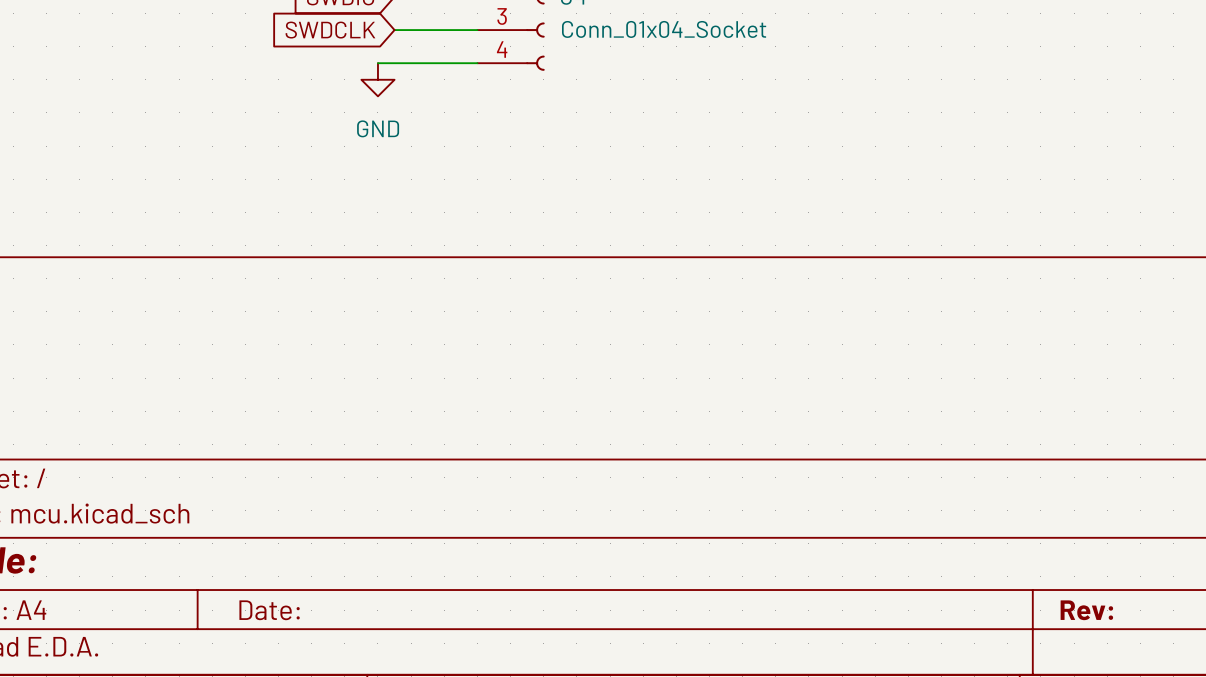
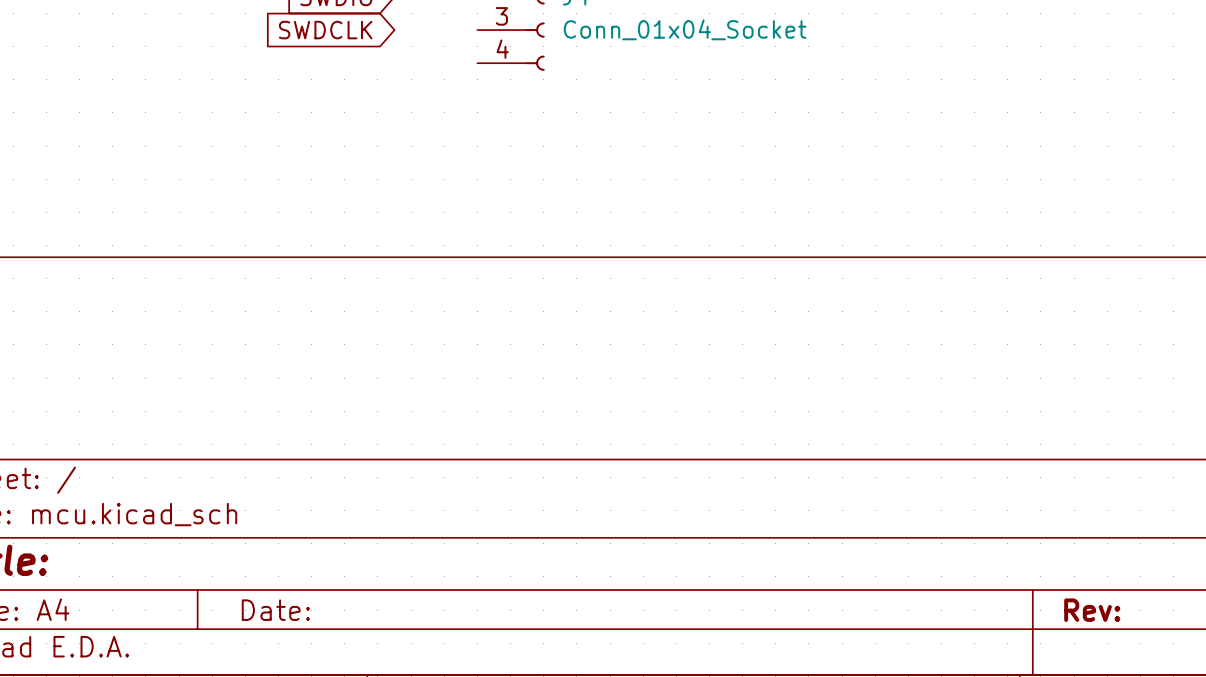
wire: (394, 30) (477, 30) -> none
wire: (377, 63) (477, 63) -> none
power symbol: GND (377, 79) -> none

